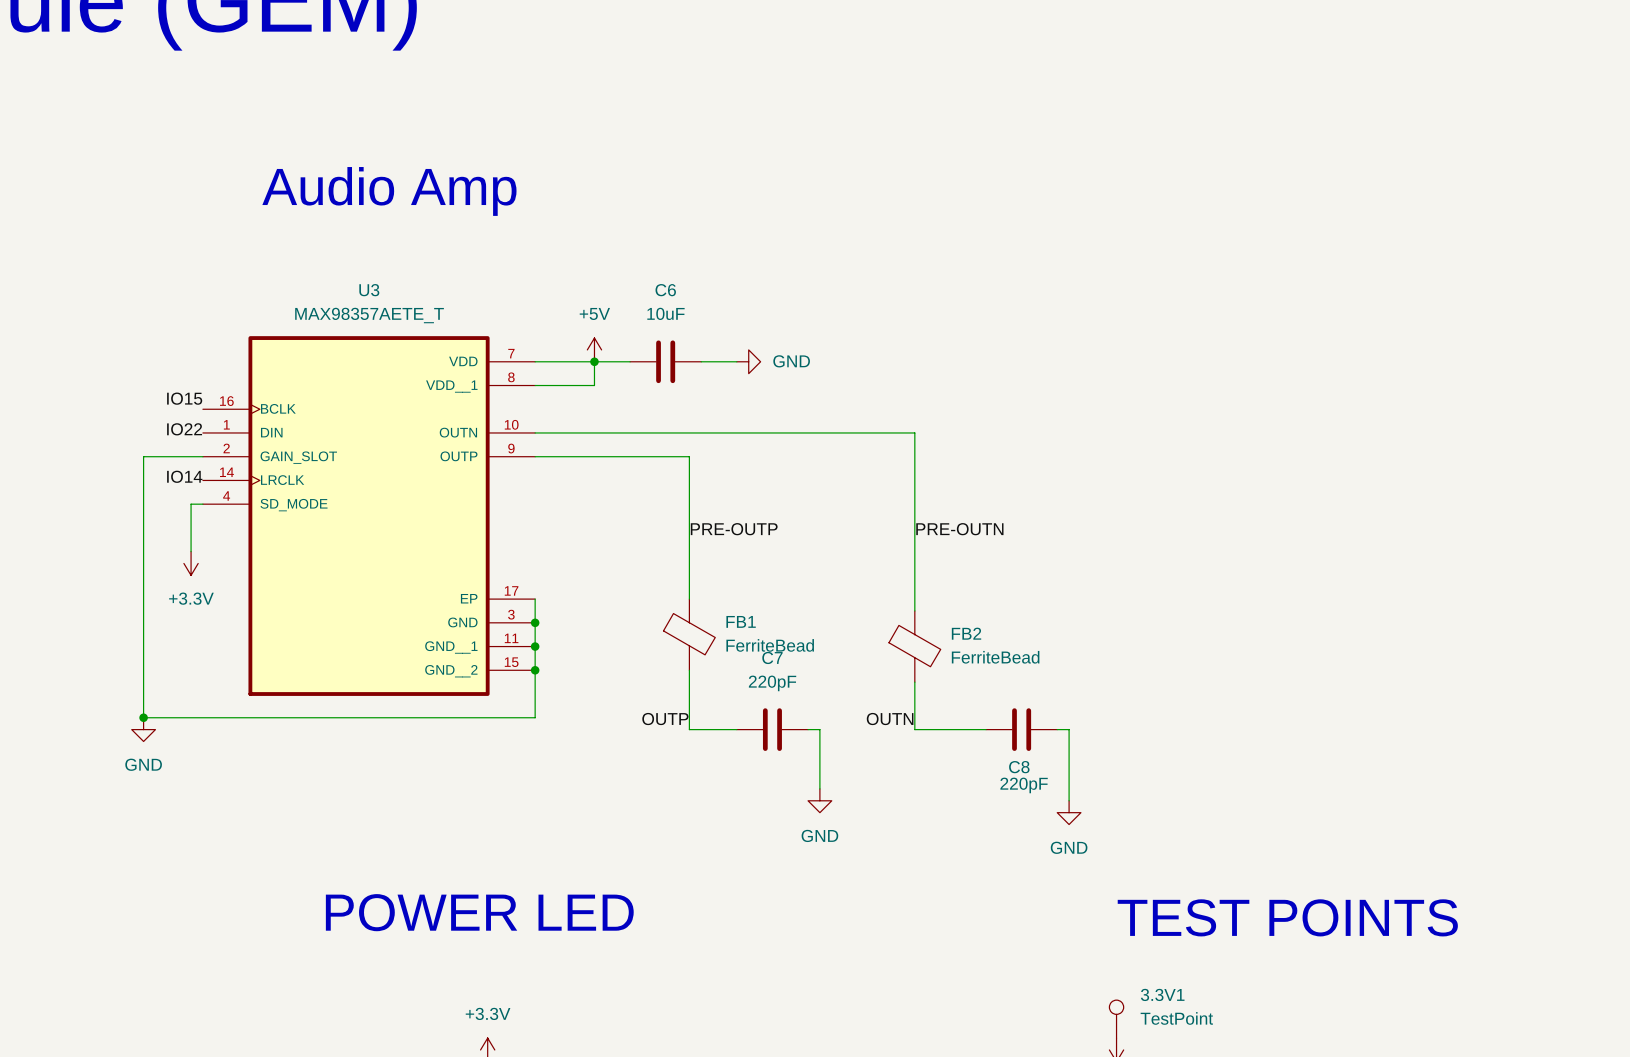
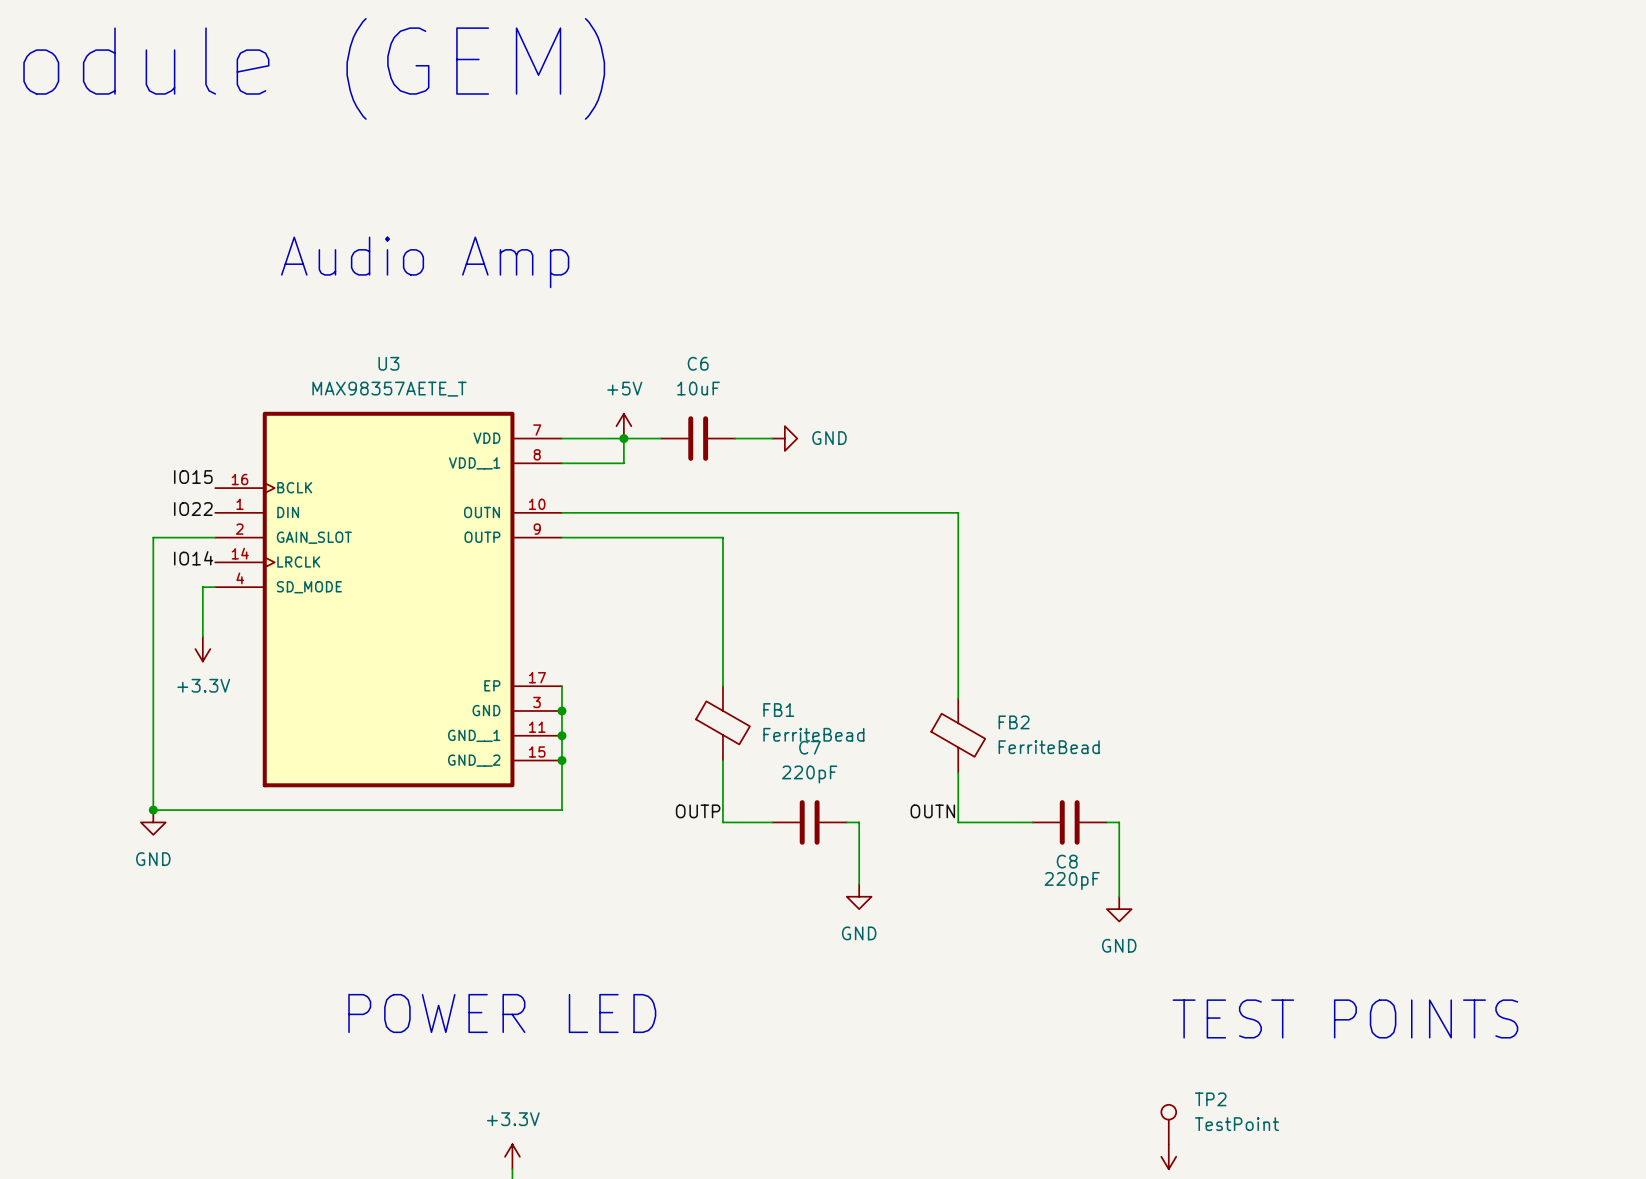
label: PRE-OUTP (734, 529) -> none
label: PRE-OUTN (959, 529) -> none
3.3V1 name: 3.3V1 (1162, 994) -> TP2 (1210, 1099)

